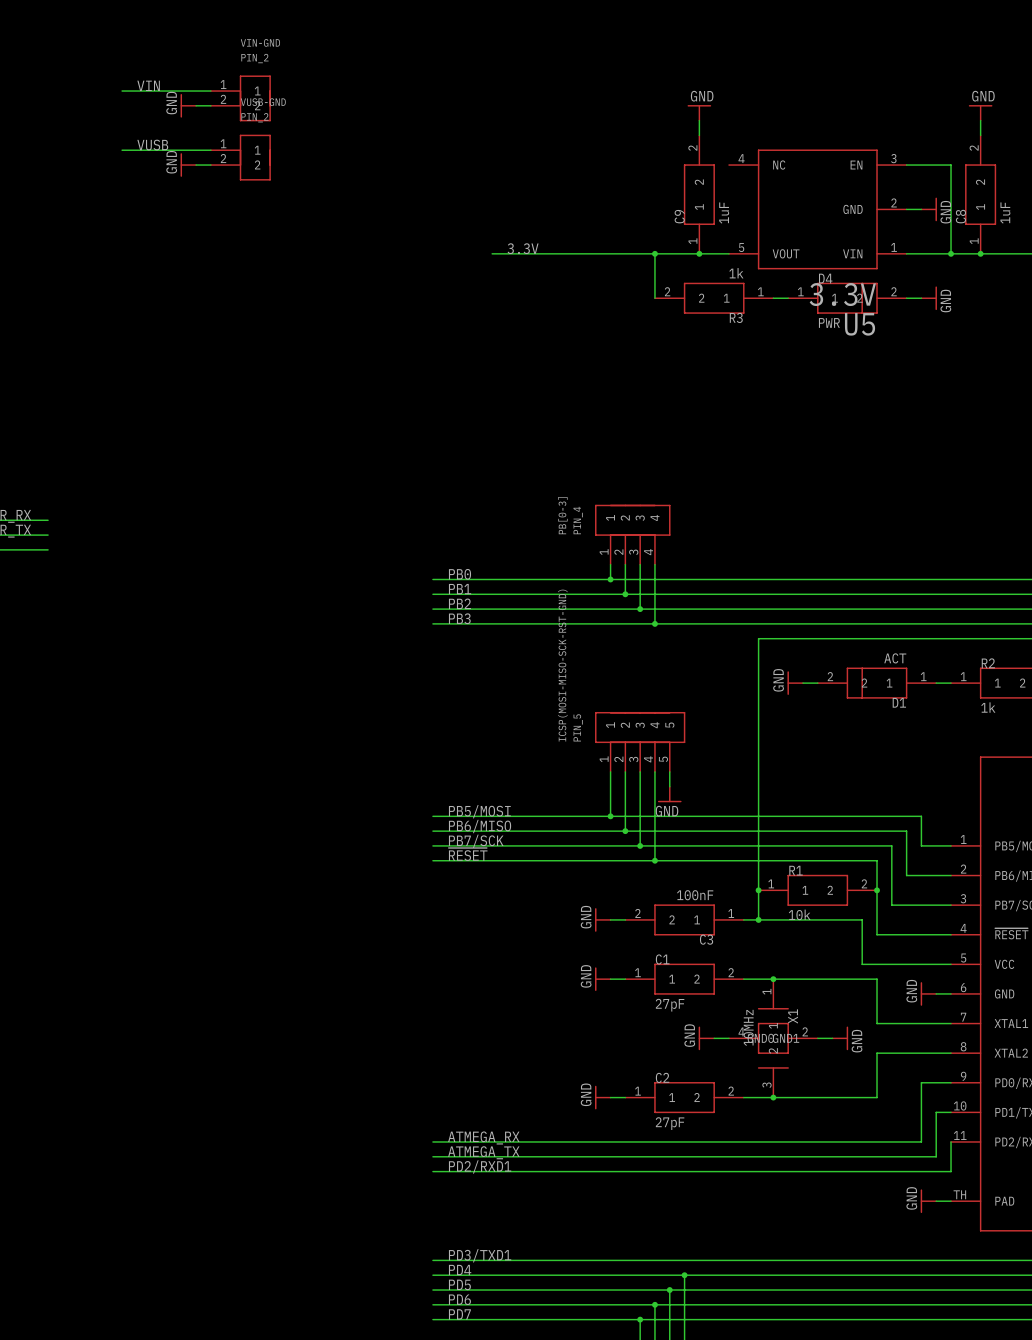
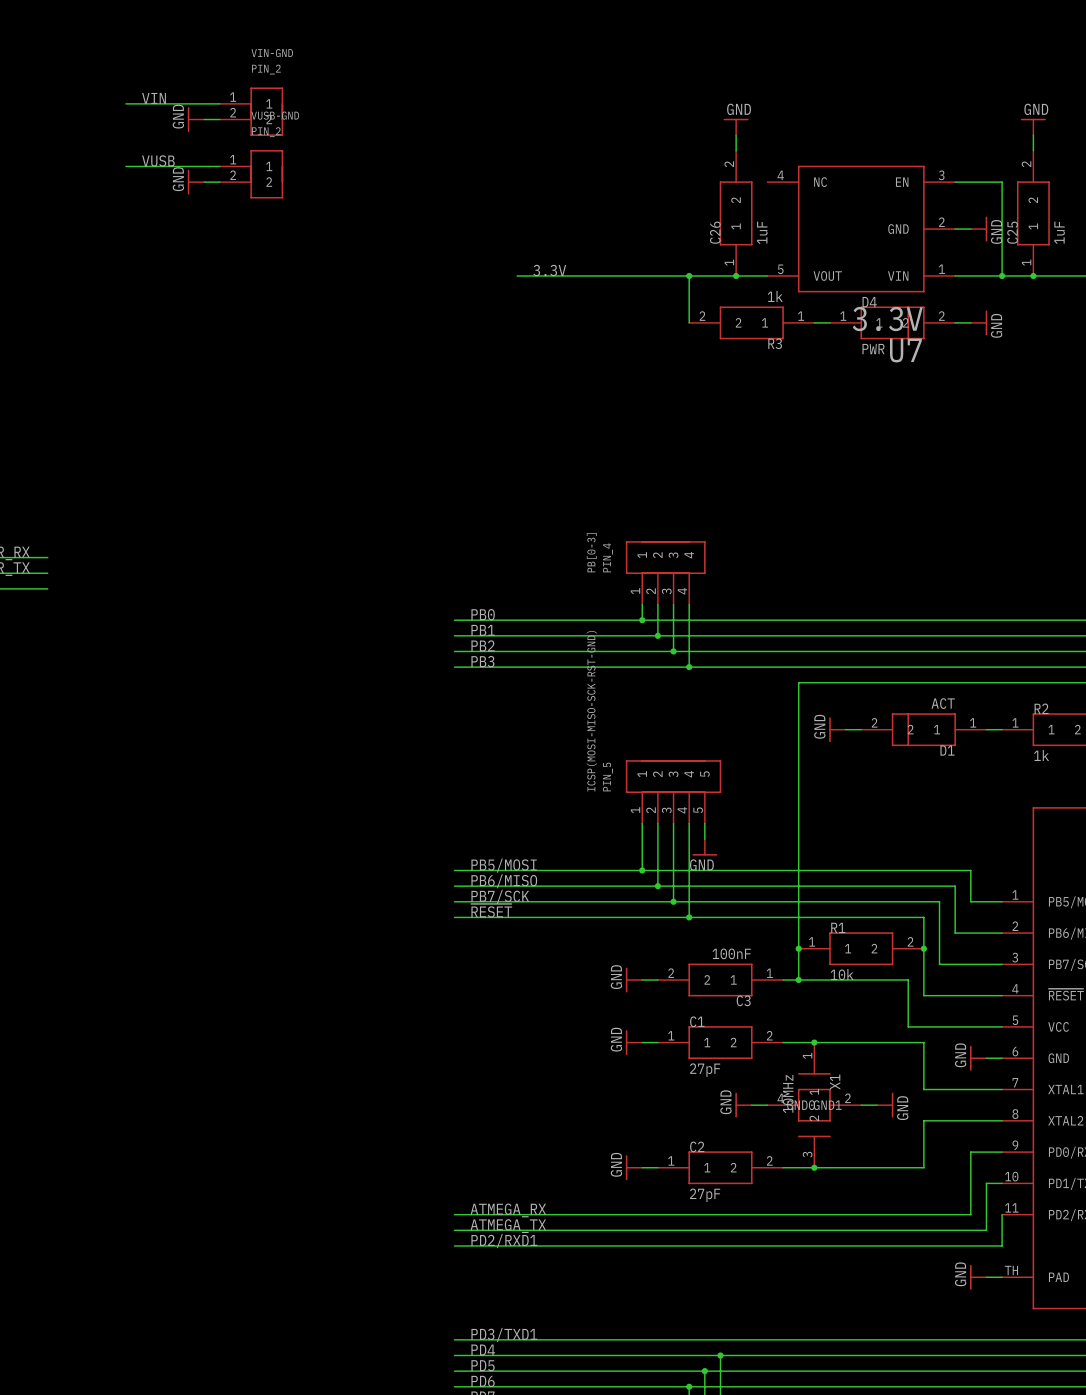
C9 name: C9 (679, 216) -> C26 (715, 232)
C8 name: C8 (960, 216) -> C25 (1012, 232)
U5 name: U5 (860, 324) -> U7 (905, 350)

